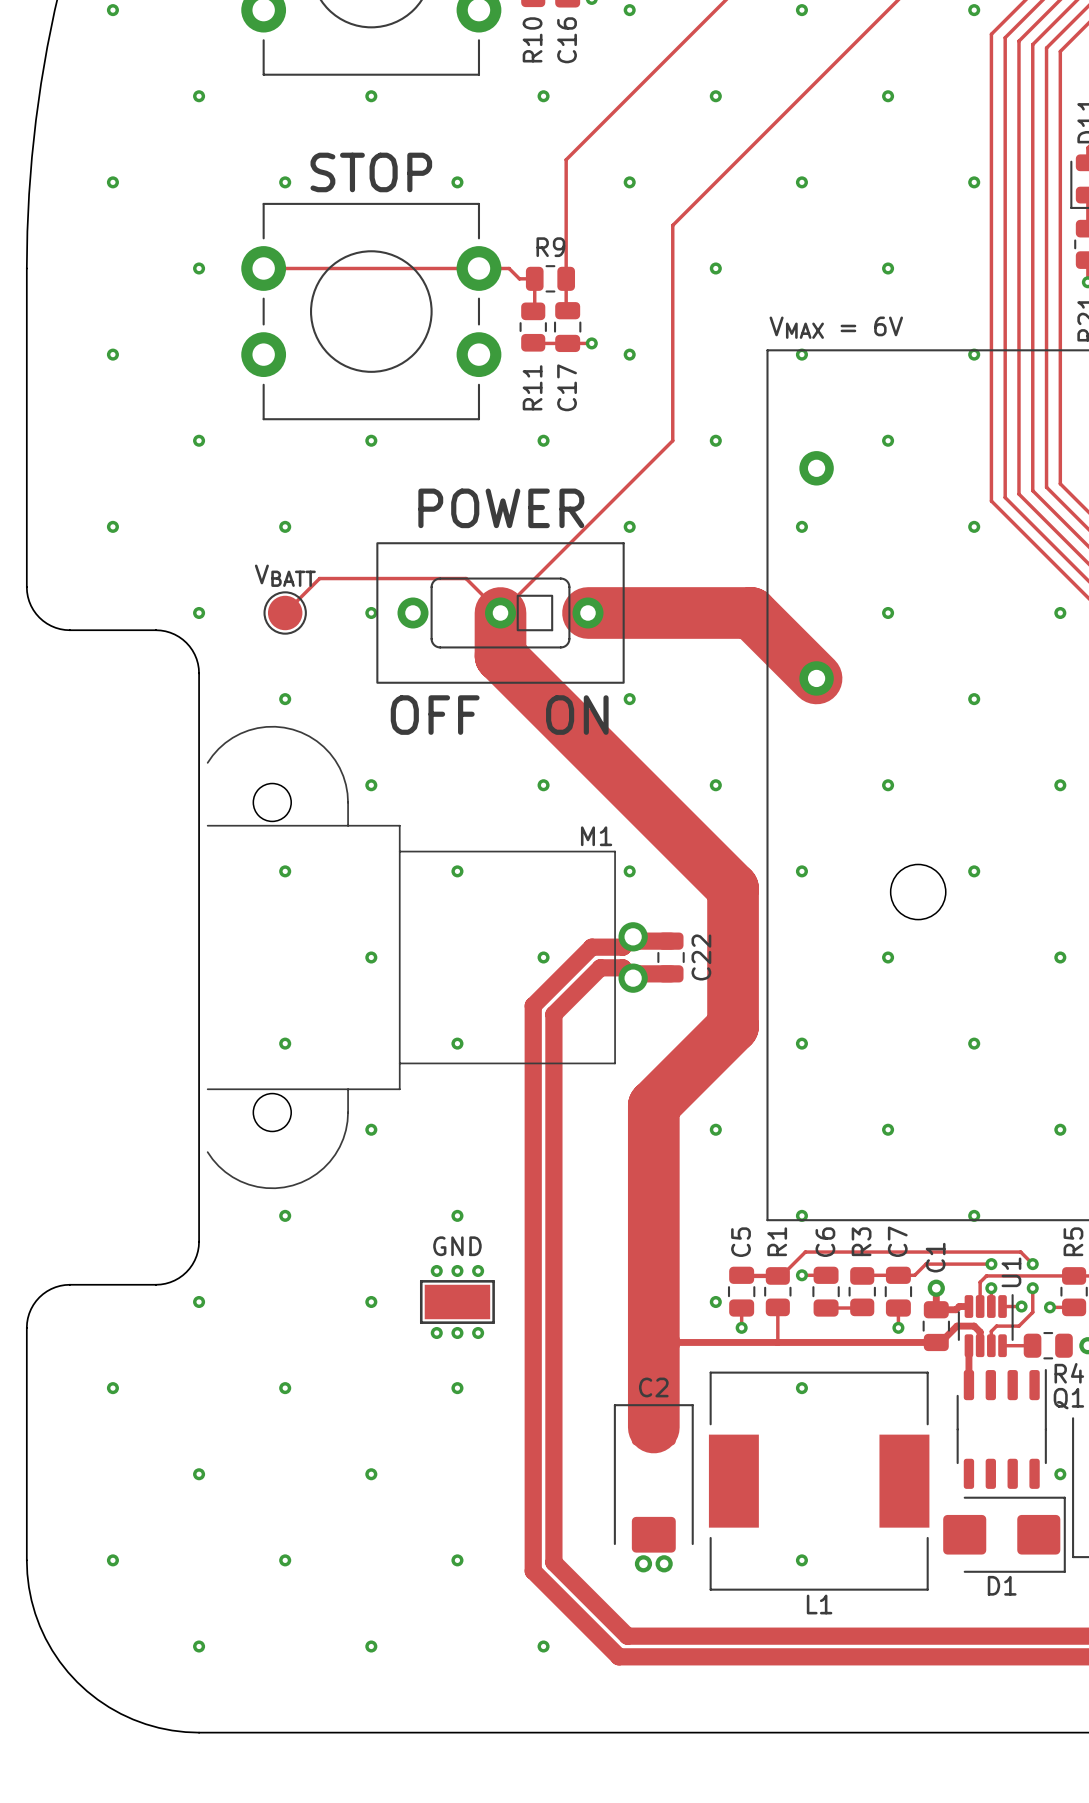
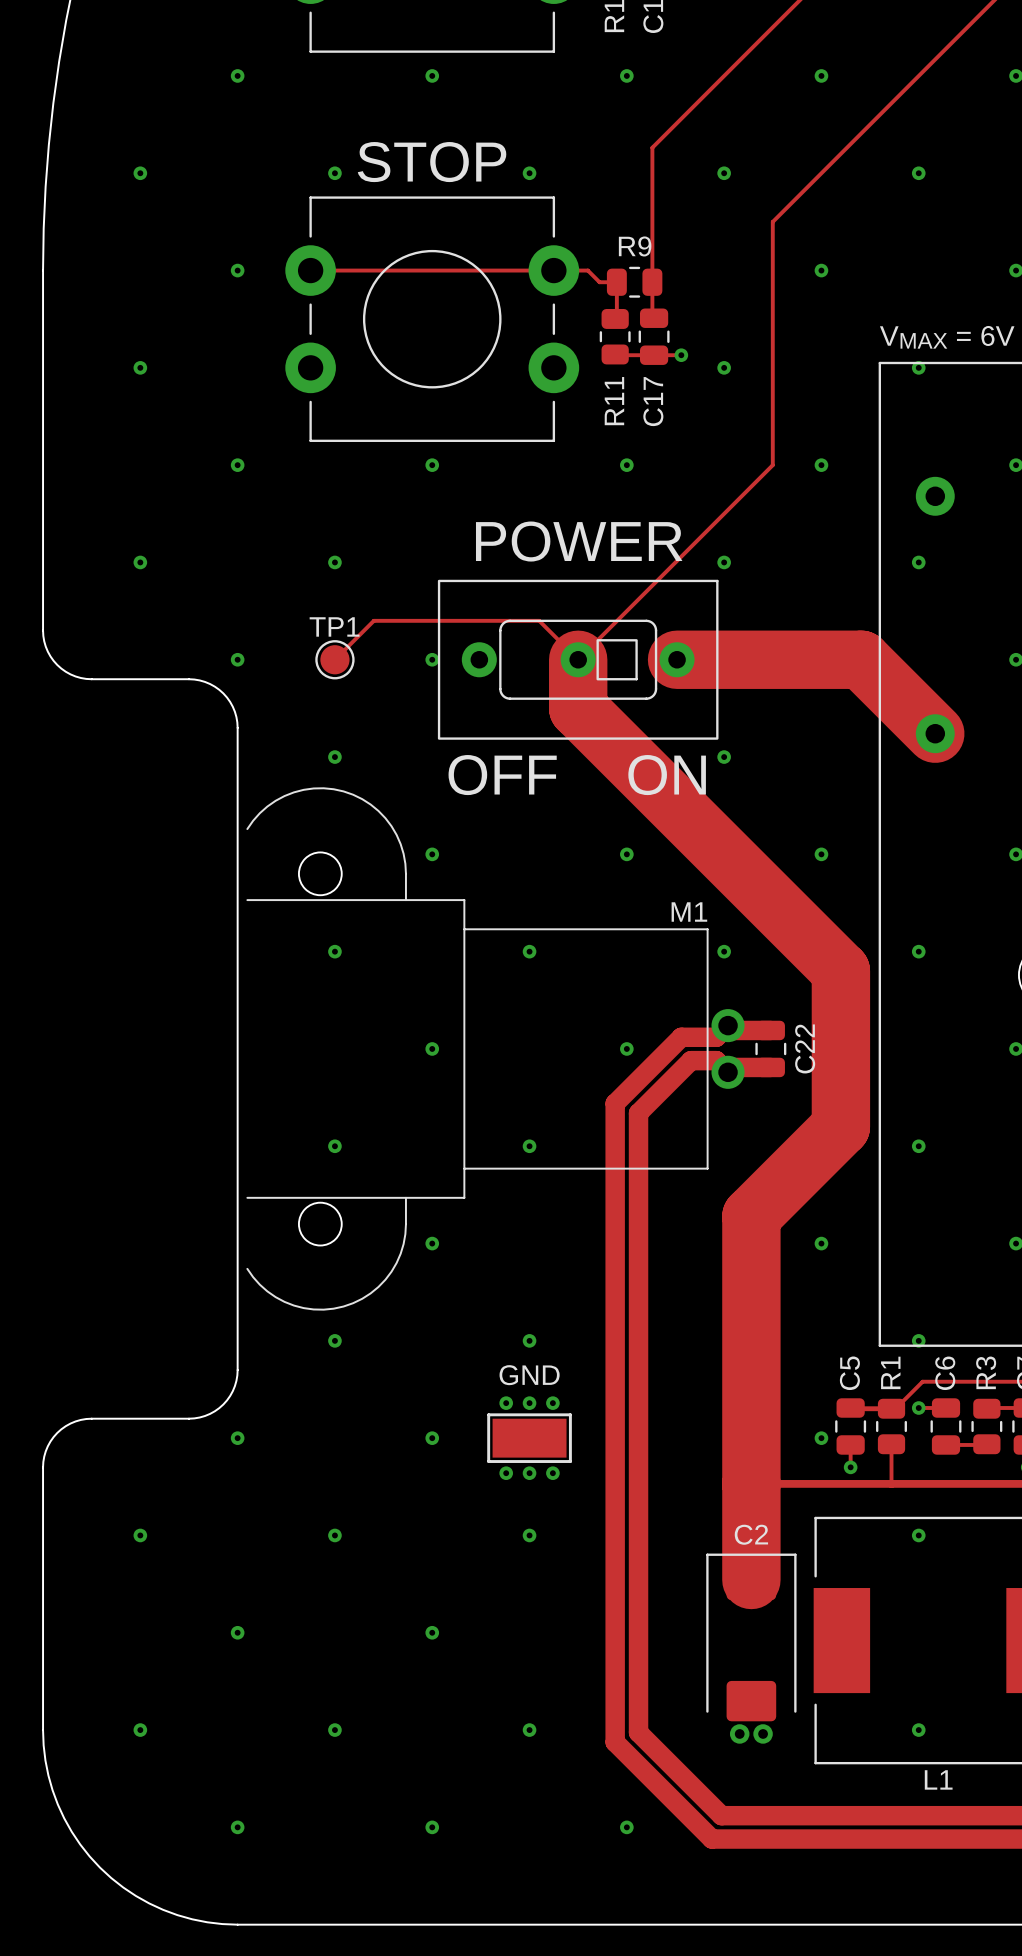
part: (285, 612) -> none
TP1: none -> (334, 659)

